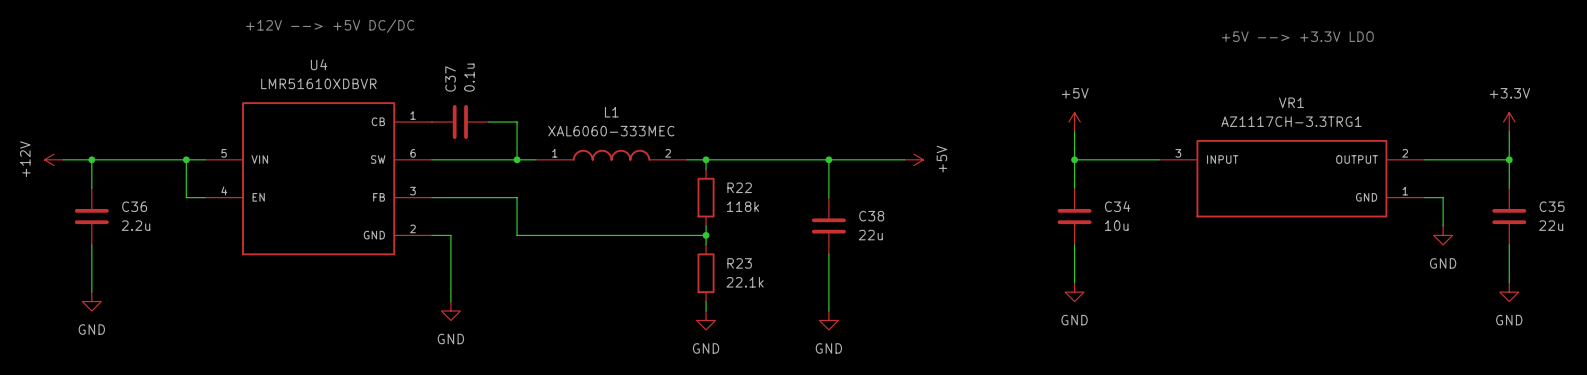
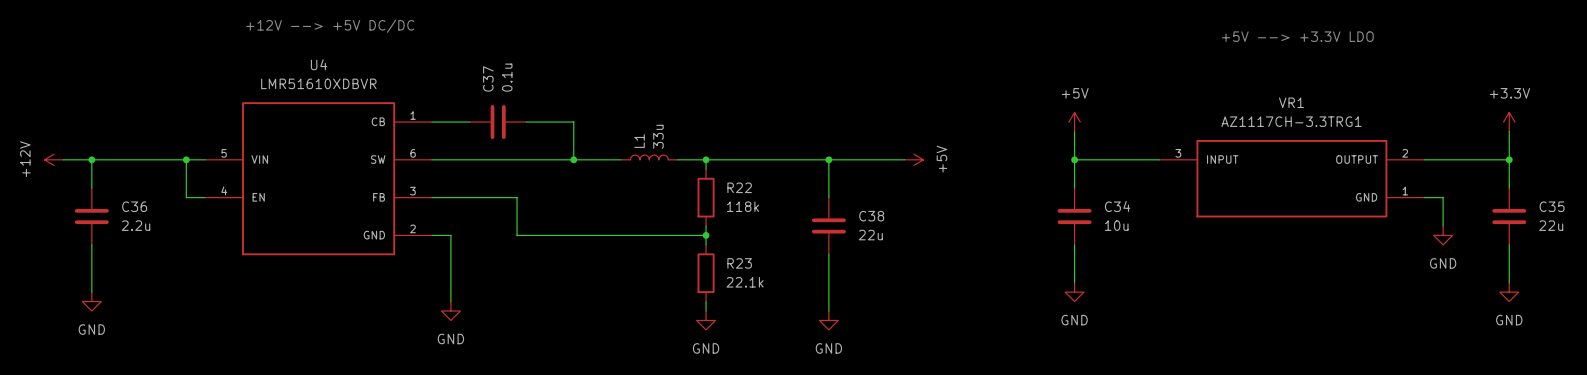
L1 name position: L1 (611, 112) -> L1 (639, 141)
C37 position: (460, 122) -> (498, 122)
wire: (488, 122) (517, 122) (517, 159) -> none
wire: none -> (526, 122) (573, 122) (573, 159)
L1 value: XAL6060-333MEC (611, 131) -> 33u (658, 136)
L1 symbol: [535, 149, 688, 161] -> [620, 155, 678, 160]
junction: (517, 159) -> none
wire: none -> (535, 159) (620, 159)
junction: none -> (573, 159)

